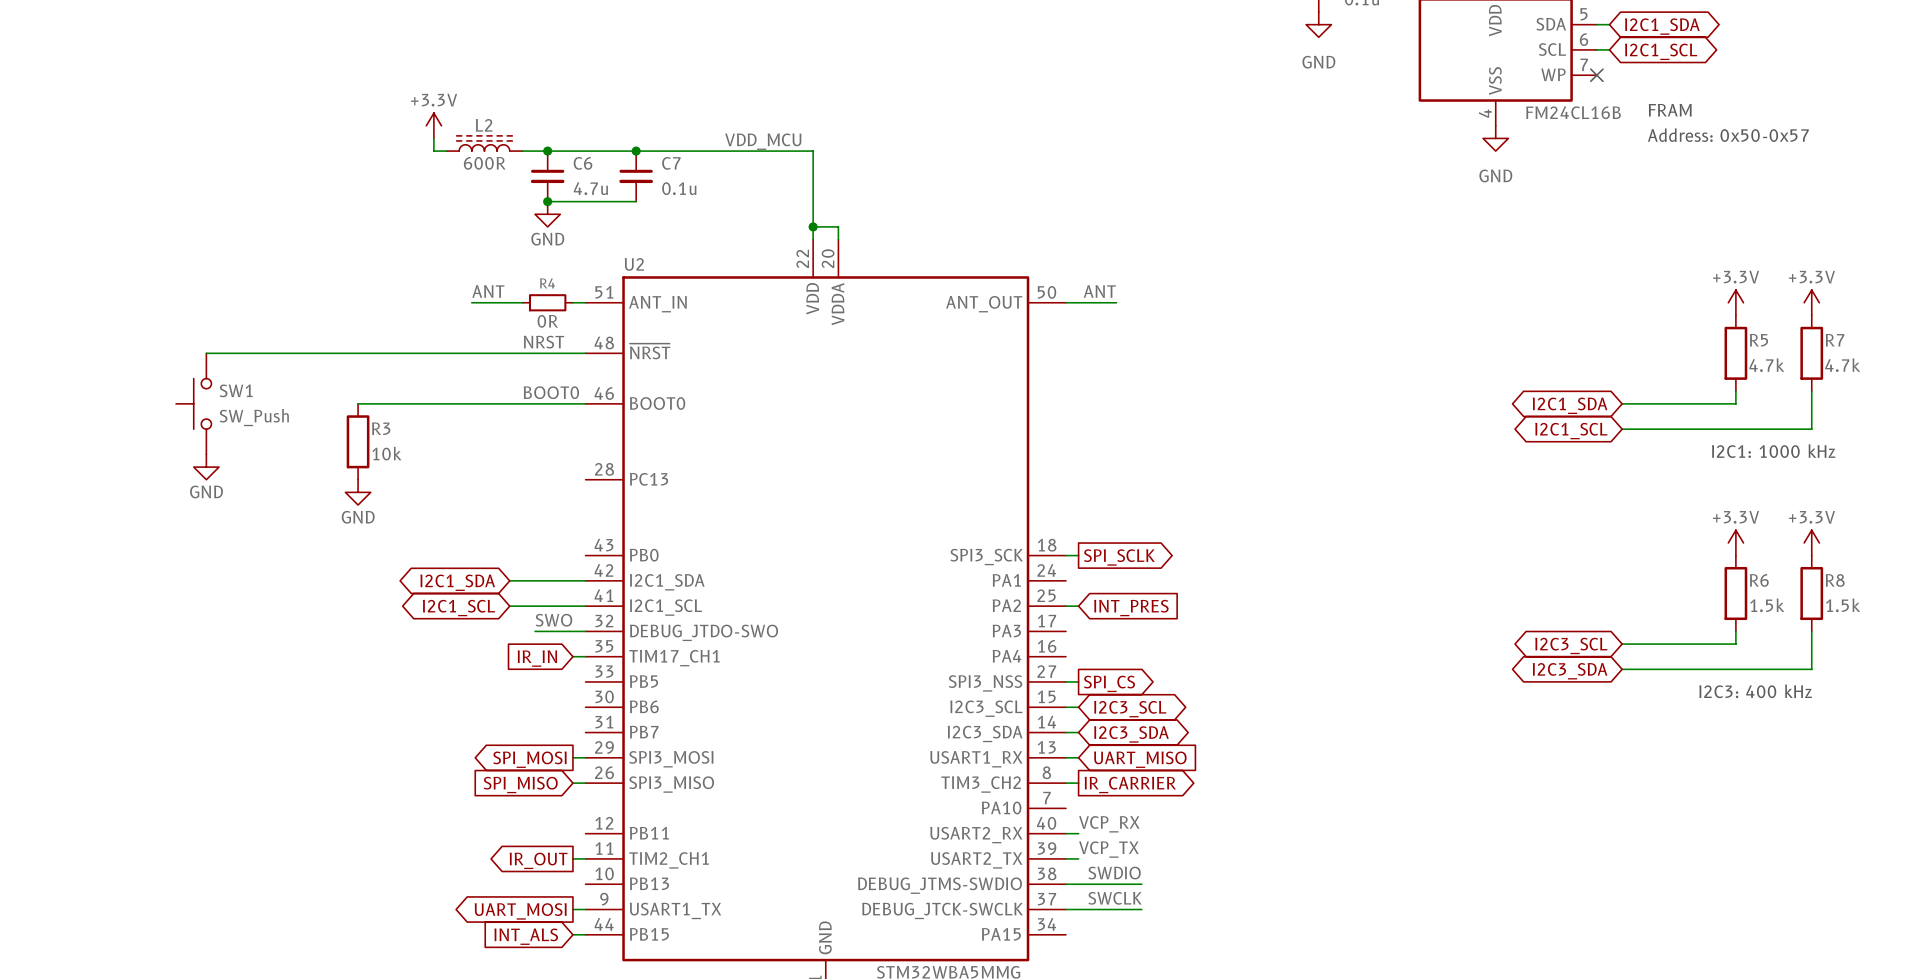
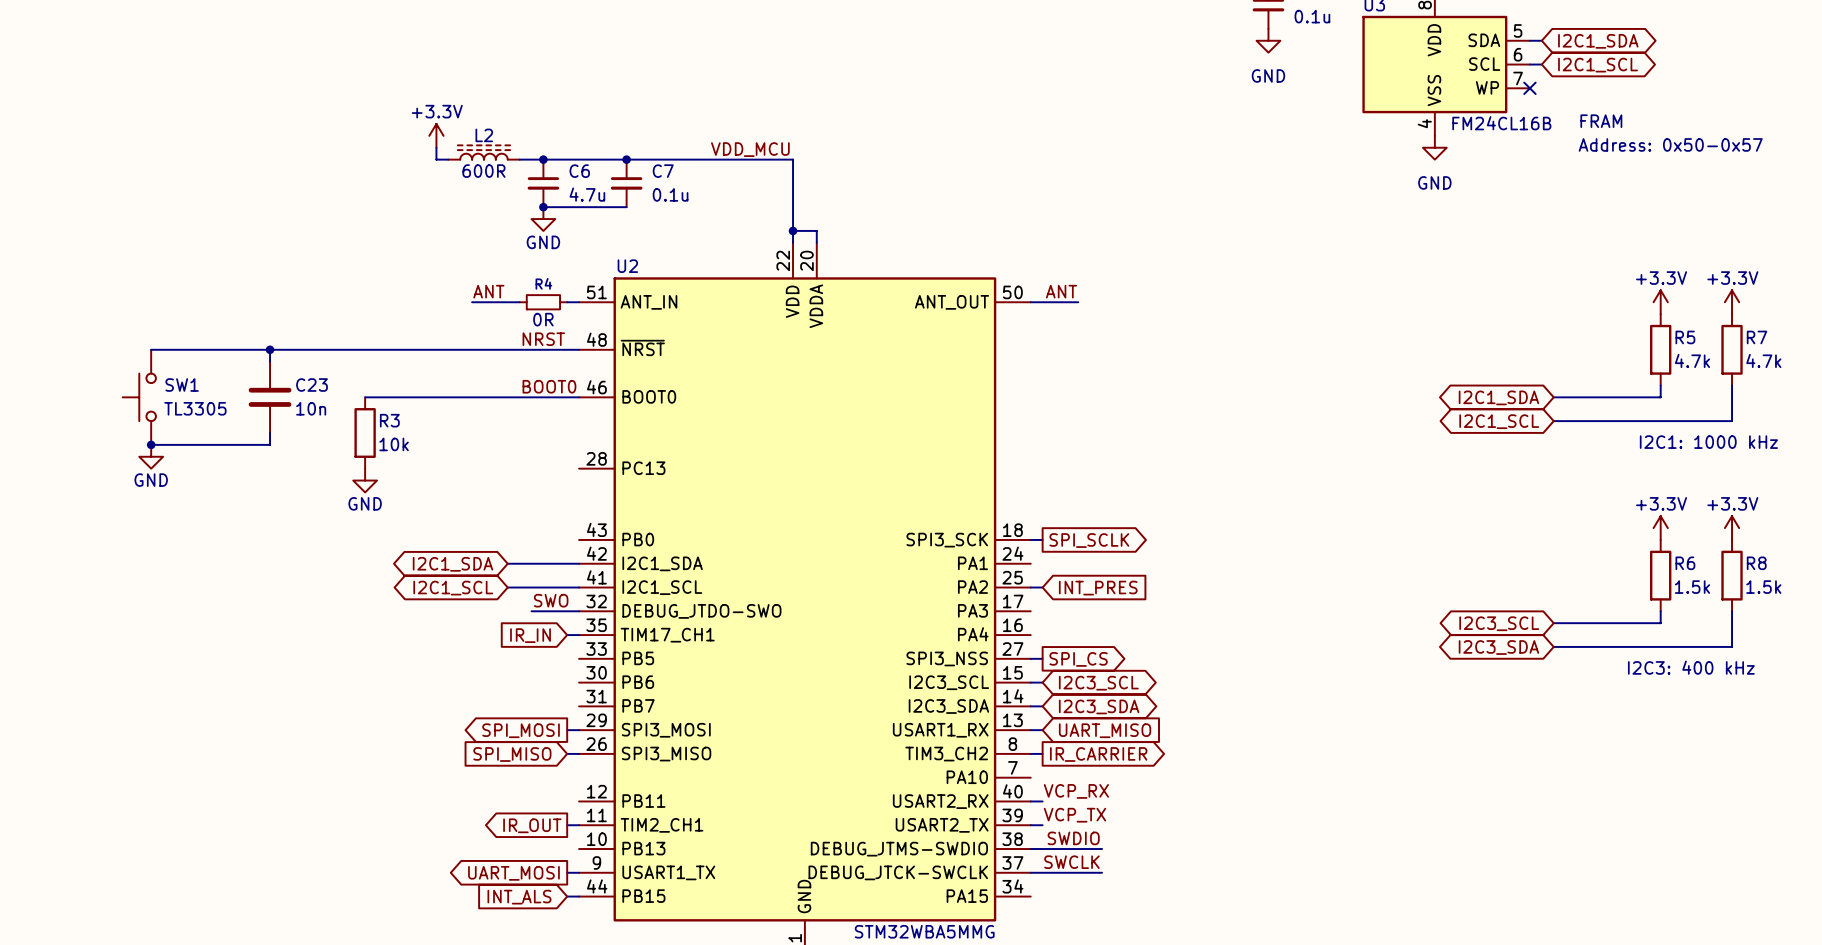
wire: none -> (151, 349) (222, 349)
wire: none -> (270, 349) (270, 361)
junction: none -> (270, 349)
SW1 position: (193, 403) -> (139, 397)
C23: none -> 10n (270, 397)
SW1 value: SW_Push (254, 417) -> TL3305 (195, 408)
wire: none -> (270, 433) (270, 444) (151, 444)
junction: none -> (151, 444)
power symbol position: GND (206, 467) -> GND (151, 456)

